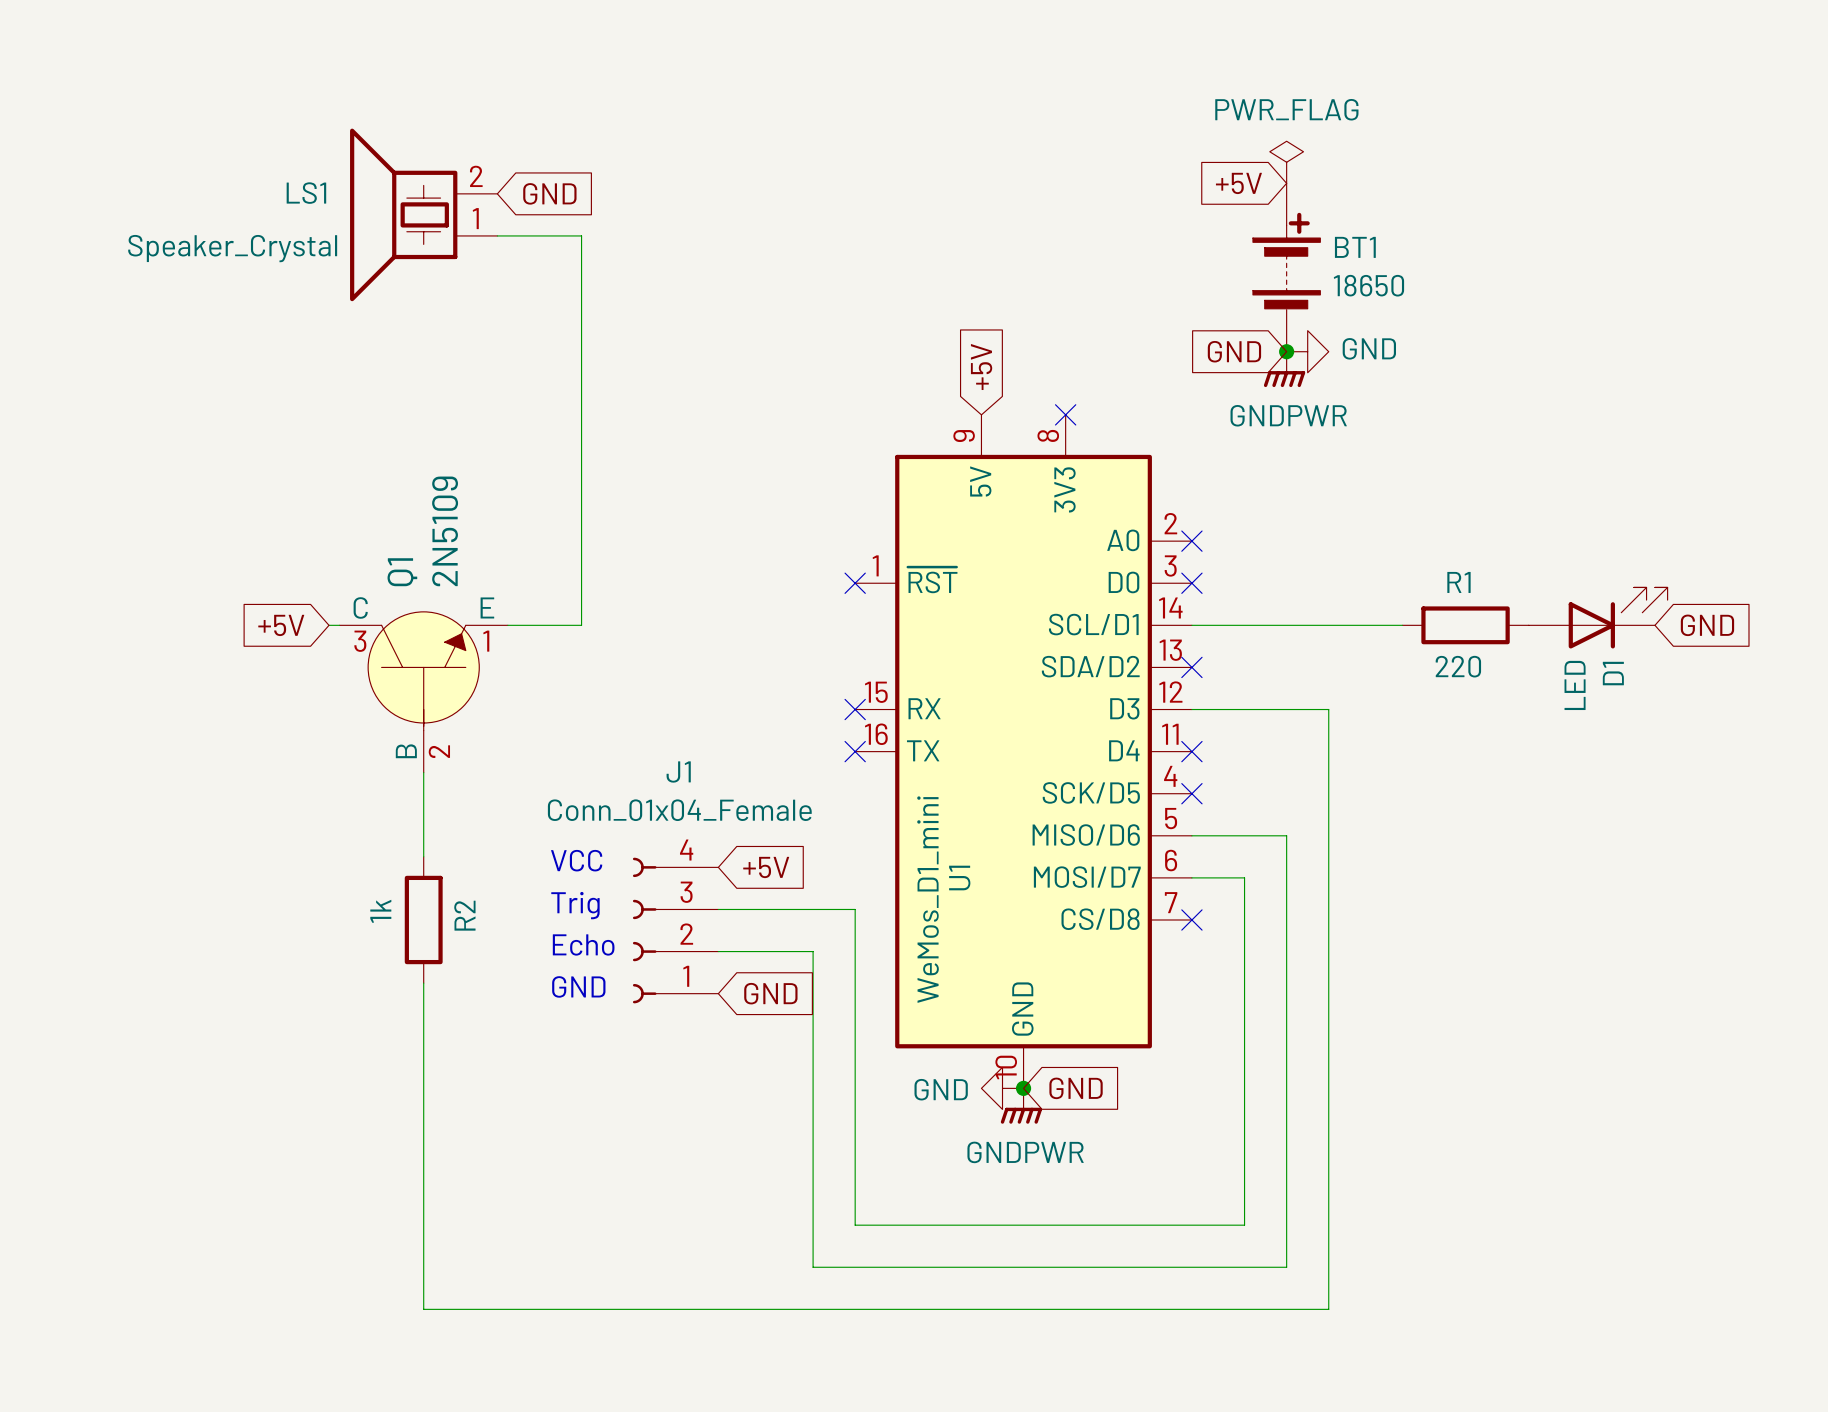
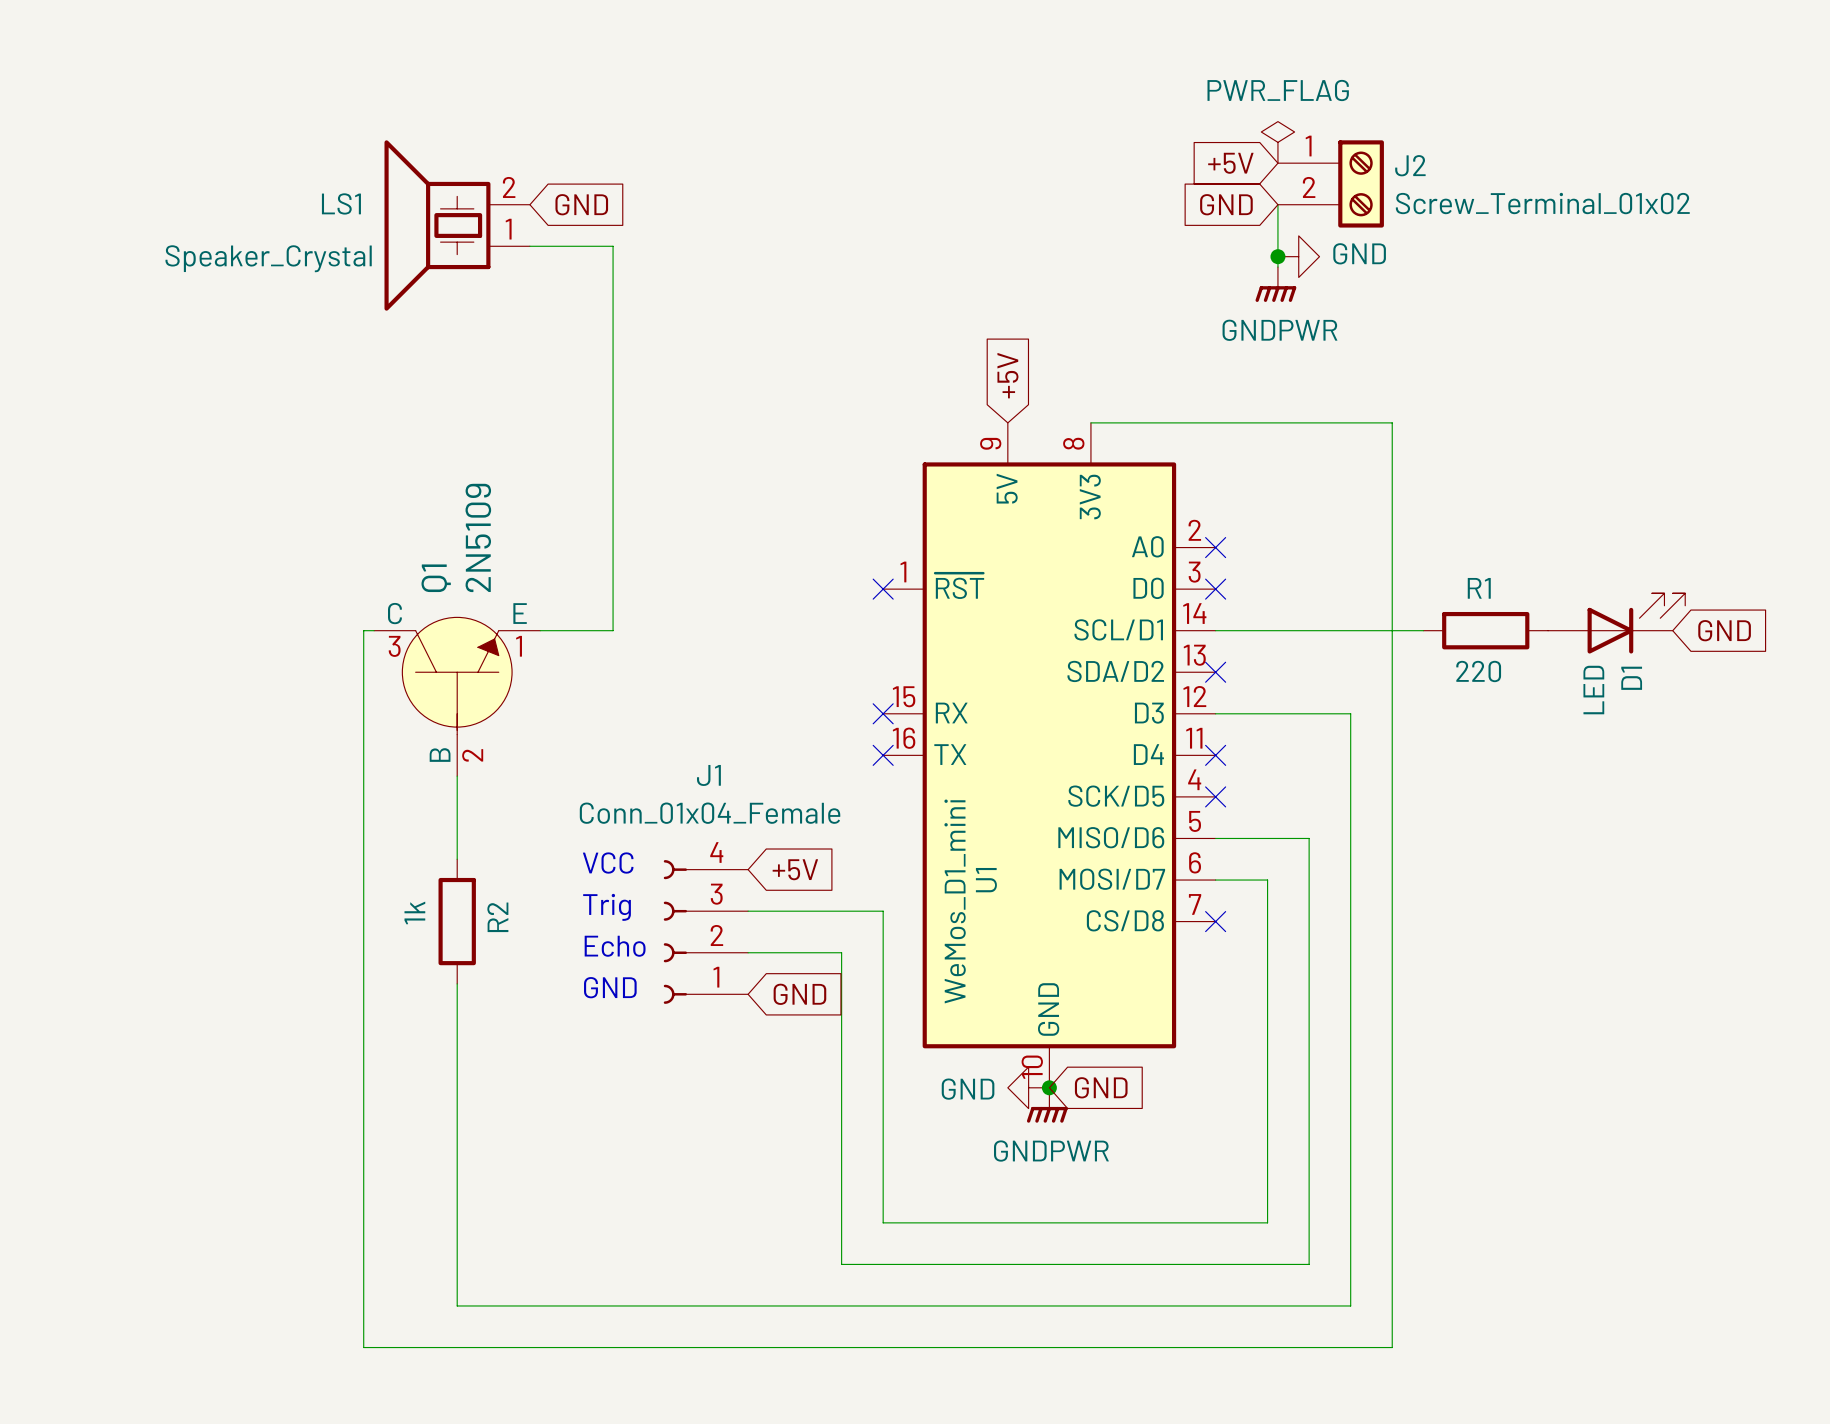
power symbol position: PWR_FLAG (1286, 162) -> PWR_FLAG (1277, 142)
J2: none -> Screw_Terminal_01x02 (1330, 183)
global label position: +5V (1238, 183) -> +5V (1230, 163)
wire: none -> (1277, 204) (1277, 267)
junction: none -> (1277, 256)
BT1: 18650 (1286, 267) -> none
global label position: GND (1234, 351) -> GND (1226, 204)
junction: (1286, 351) -> none
power symbol position: GND (1307, 351) -> GND (1298, 256)
power symbol position: GNDPWR (1284, 369) -> GNDPWR (1275, 284)
wire: none -> (1090, 422) (1392, 422) (1392, 1347) (363, 1347) (363, 630)
no-connect mark: (1065, 414) -> none
global label: +5V (281, 625) -> none

